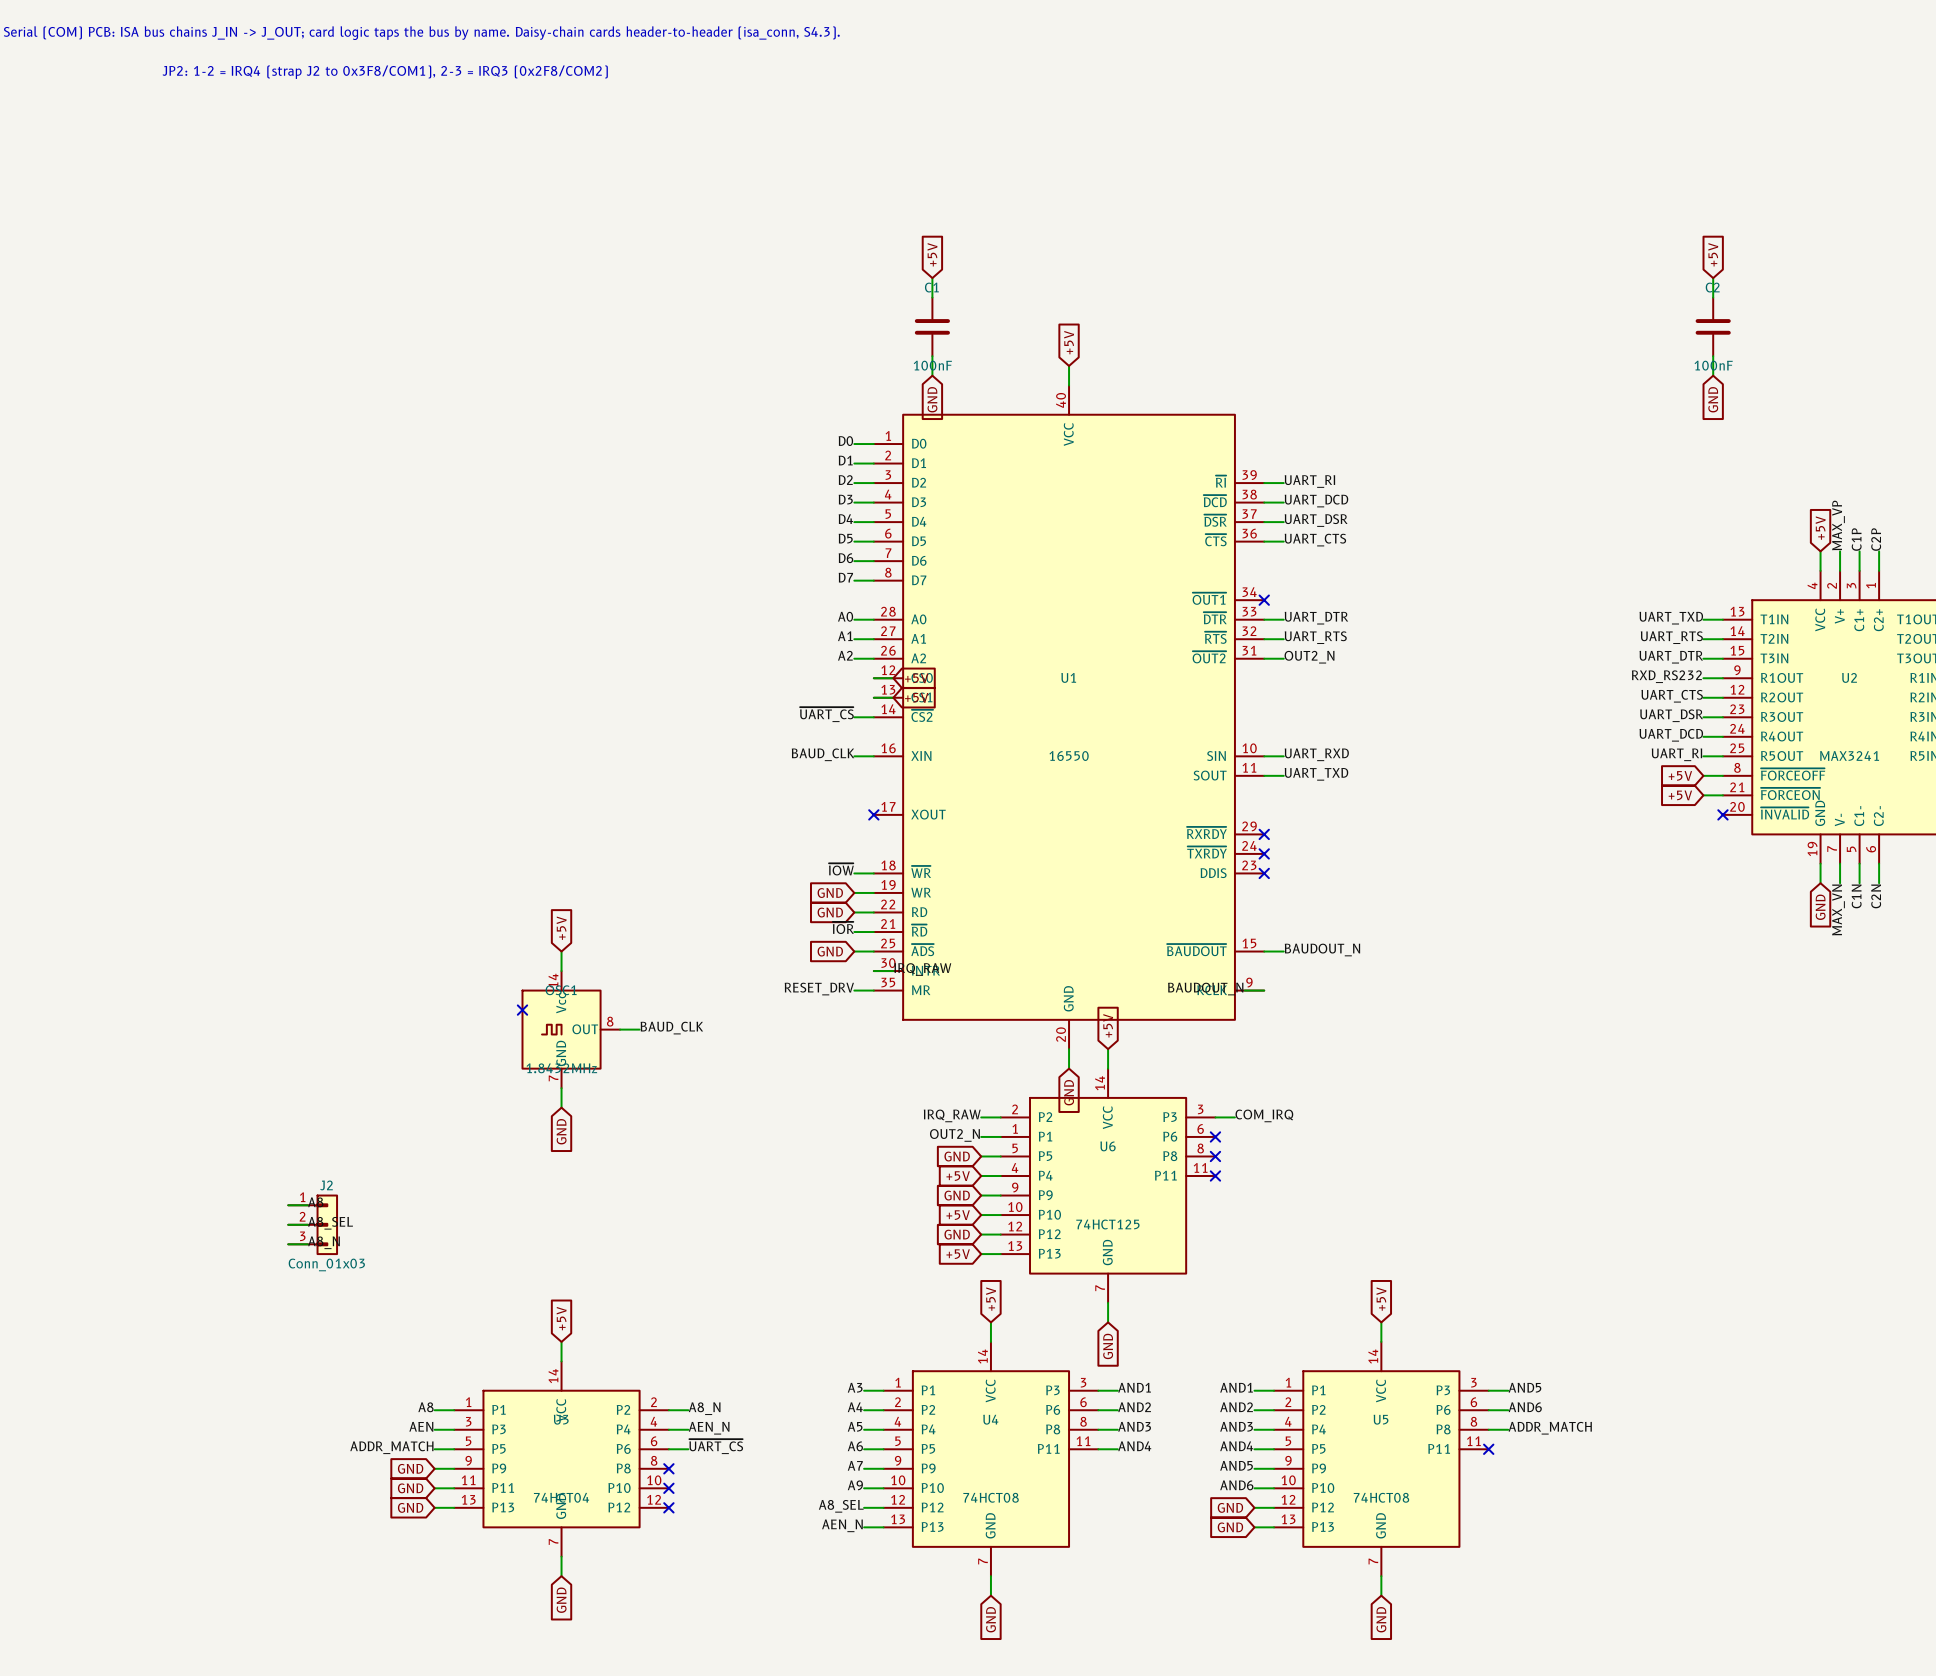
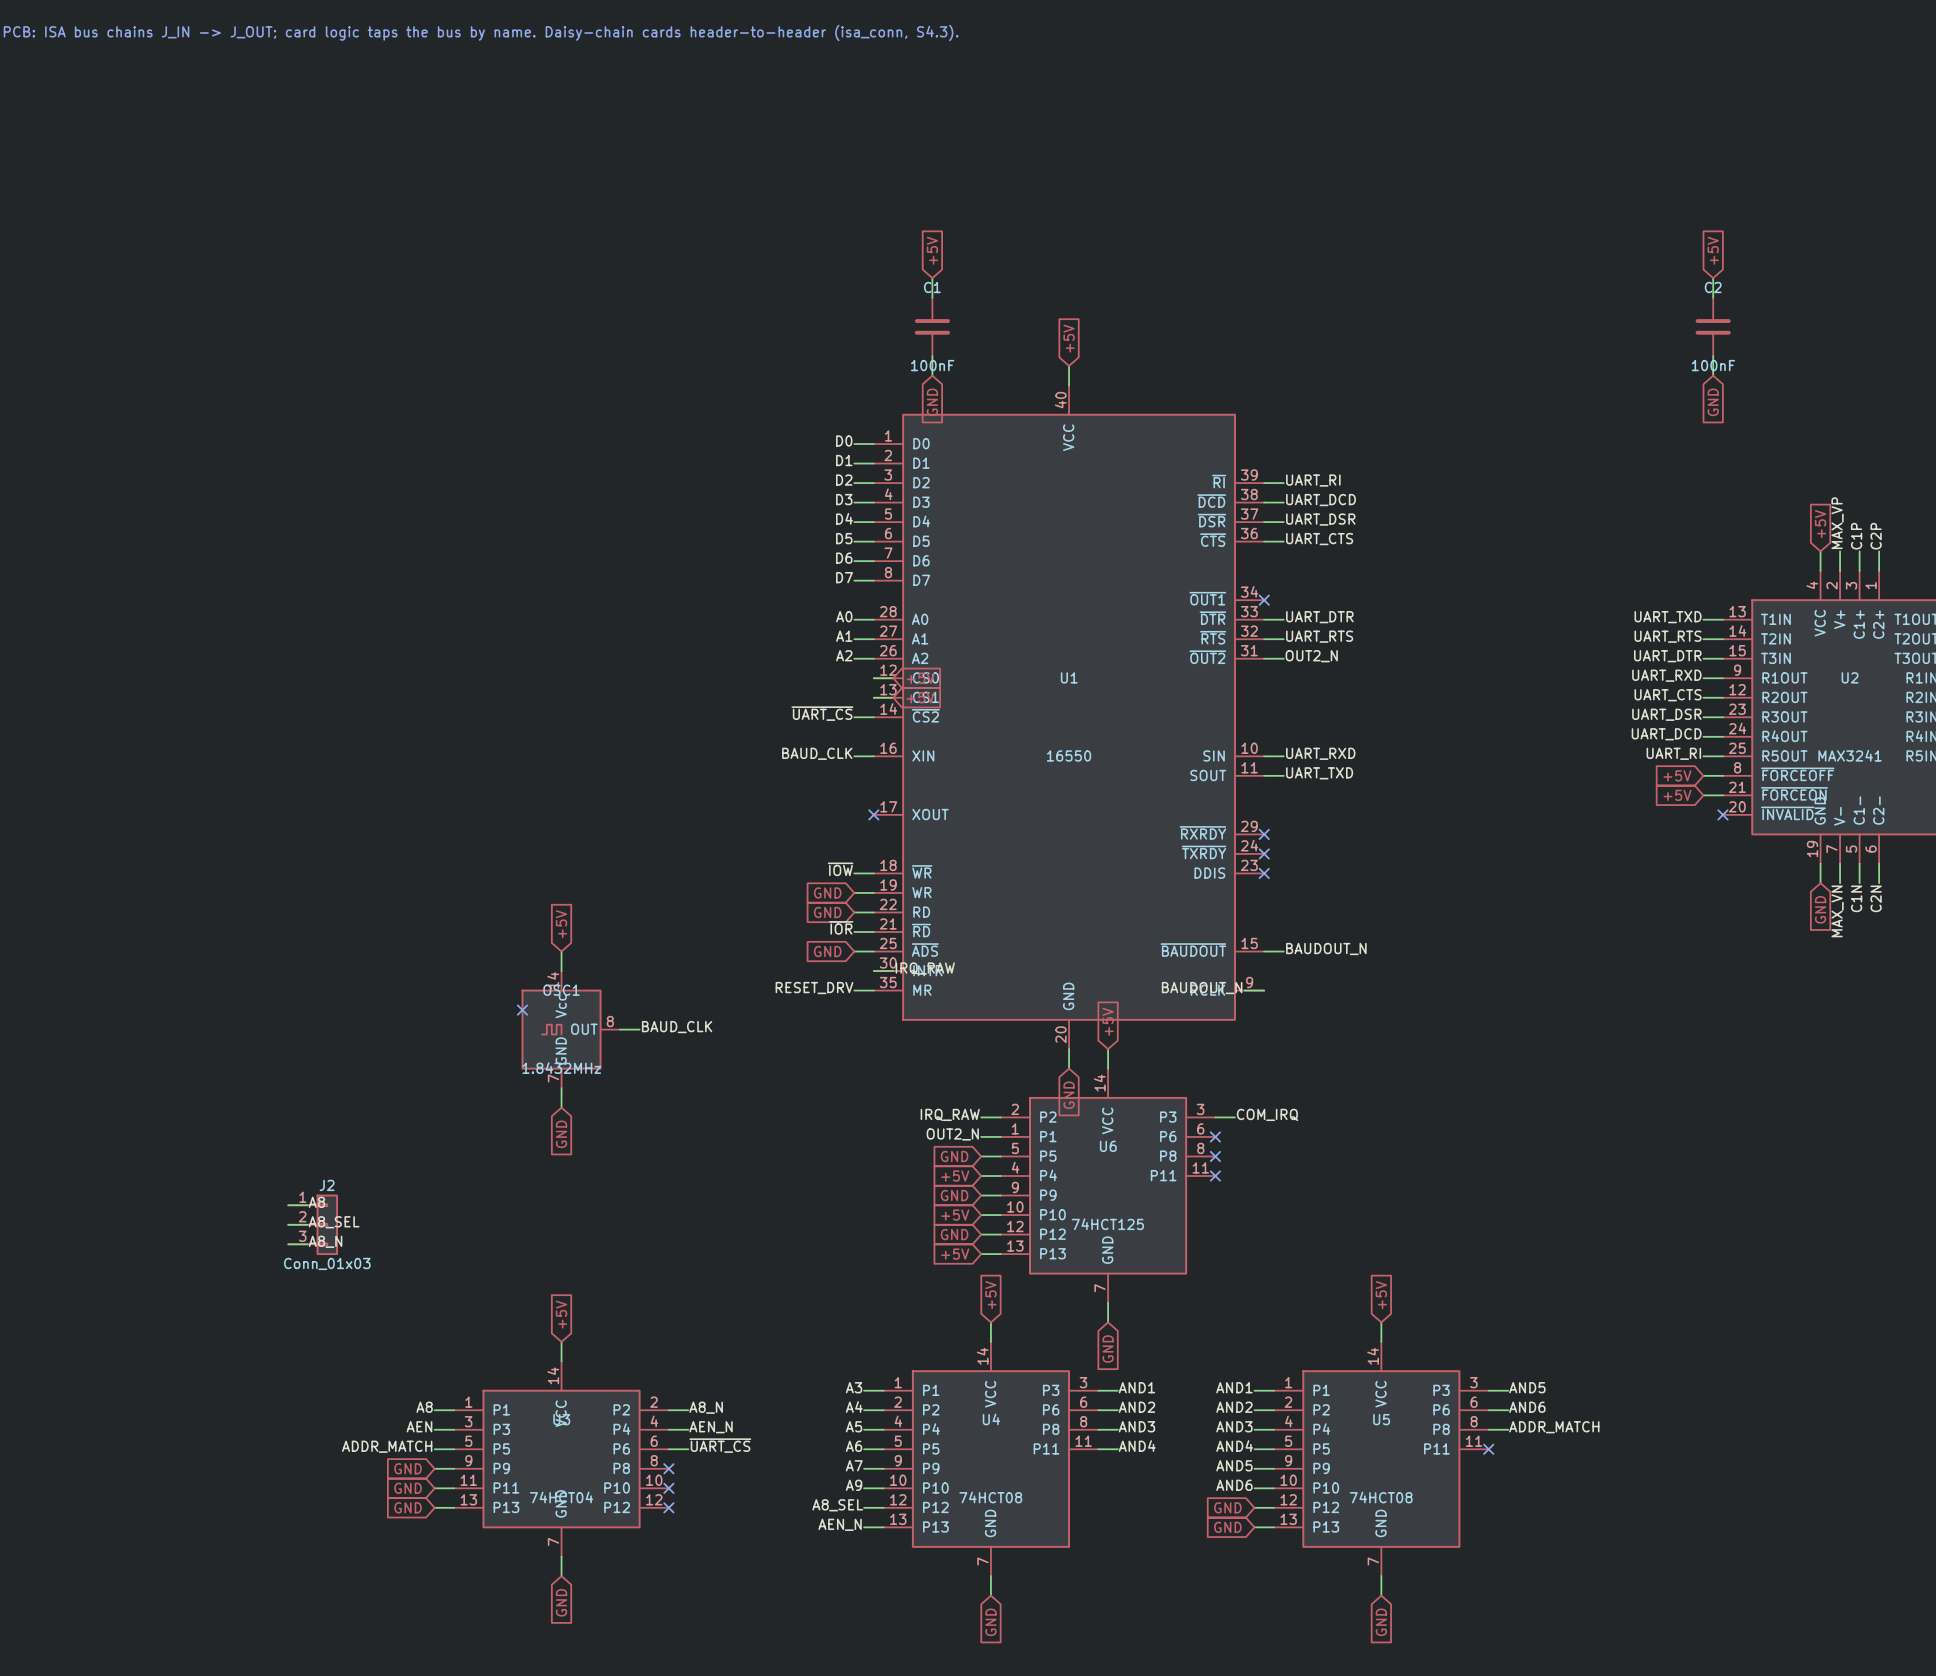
text: JP2: 1-2 = IRQ4 (strap J2 to 0x3F8/COM1), 2-3 = IRQ3 (0x2F8/COM2) (385, 72) -> none
label: RXD_RS232 (1666, 676) -> UART_RXD (1666, 675)

